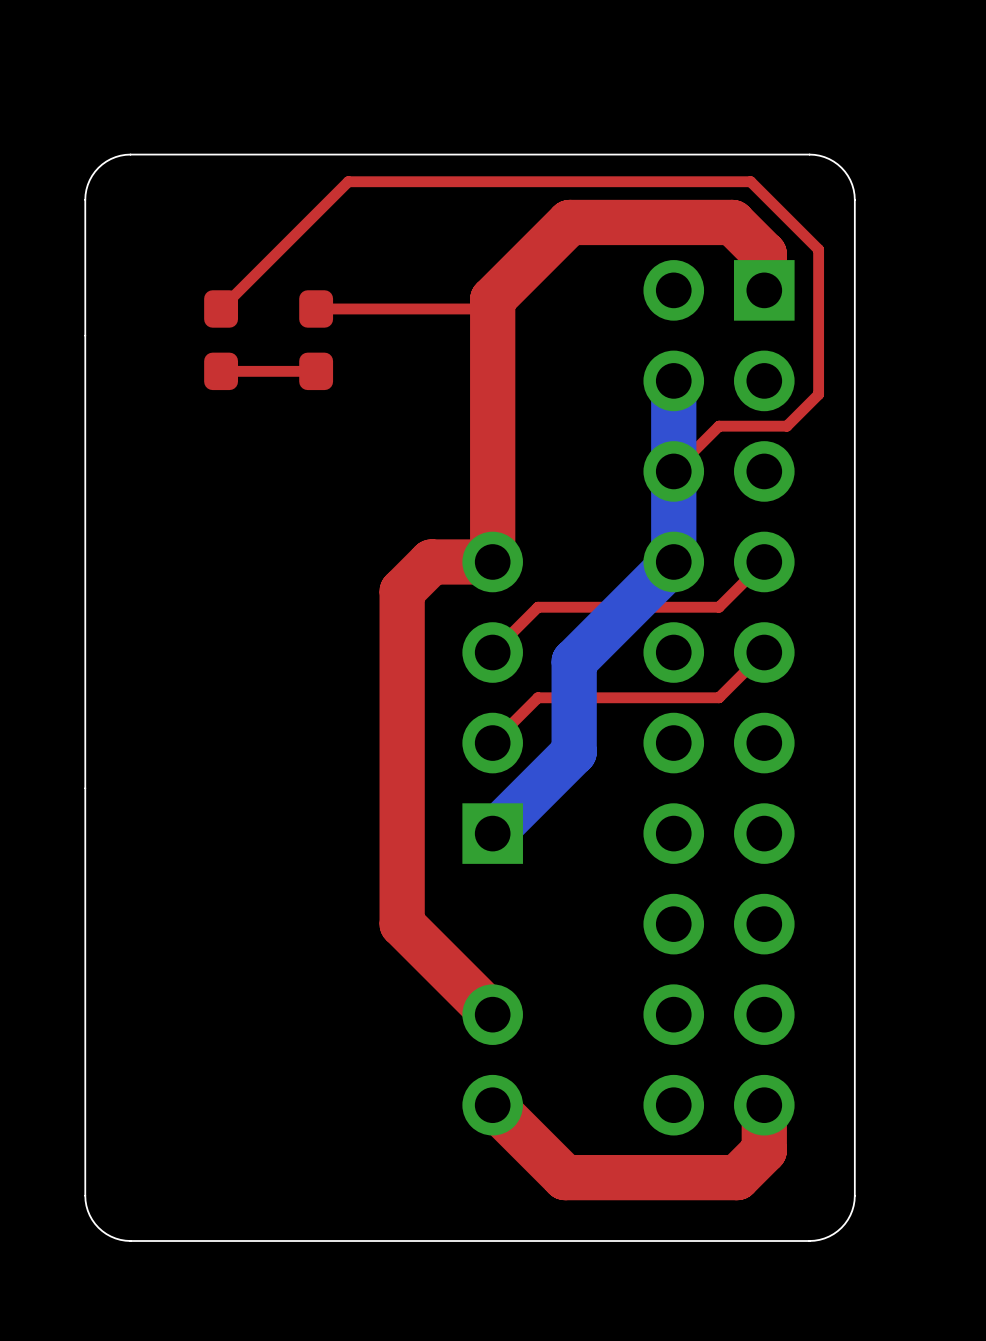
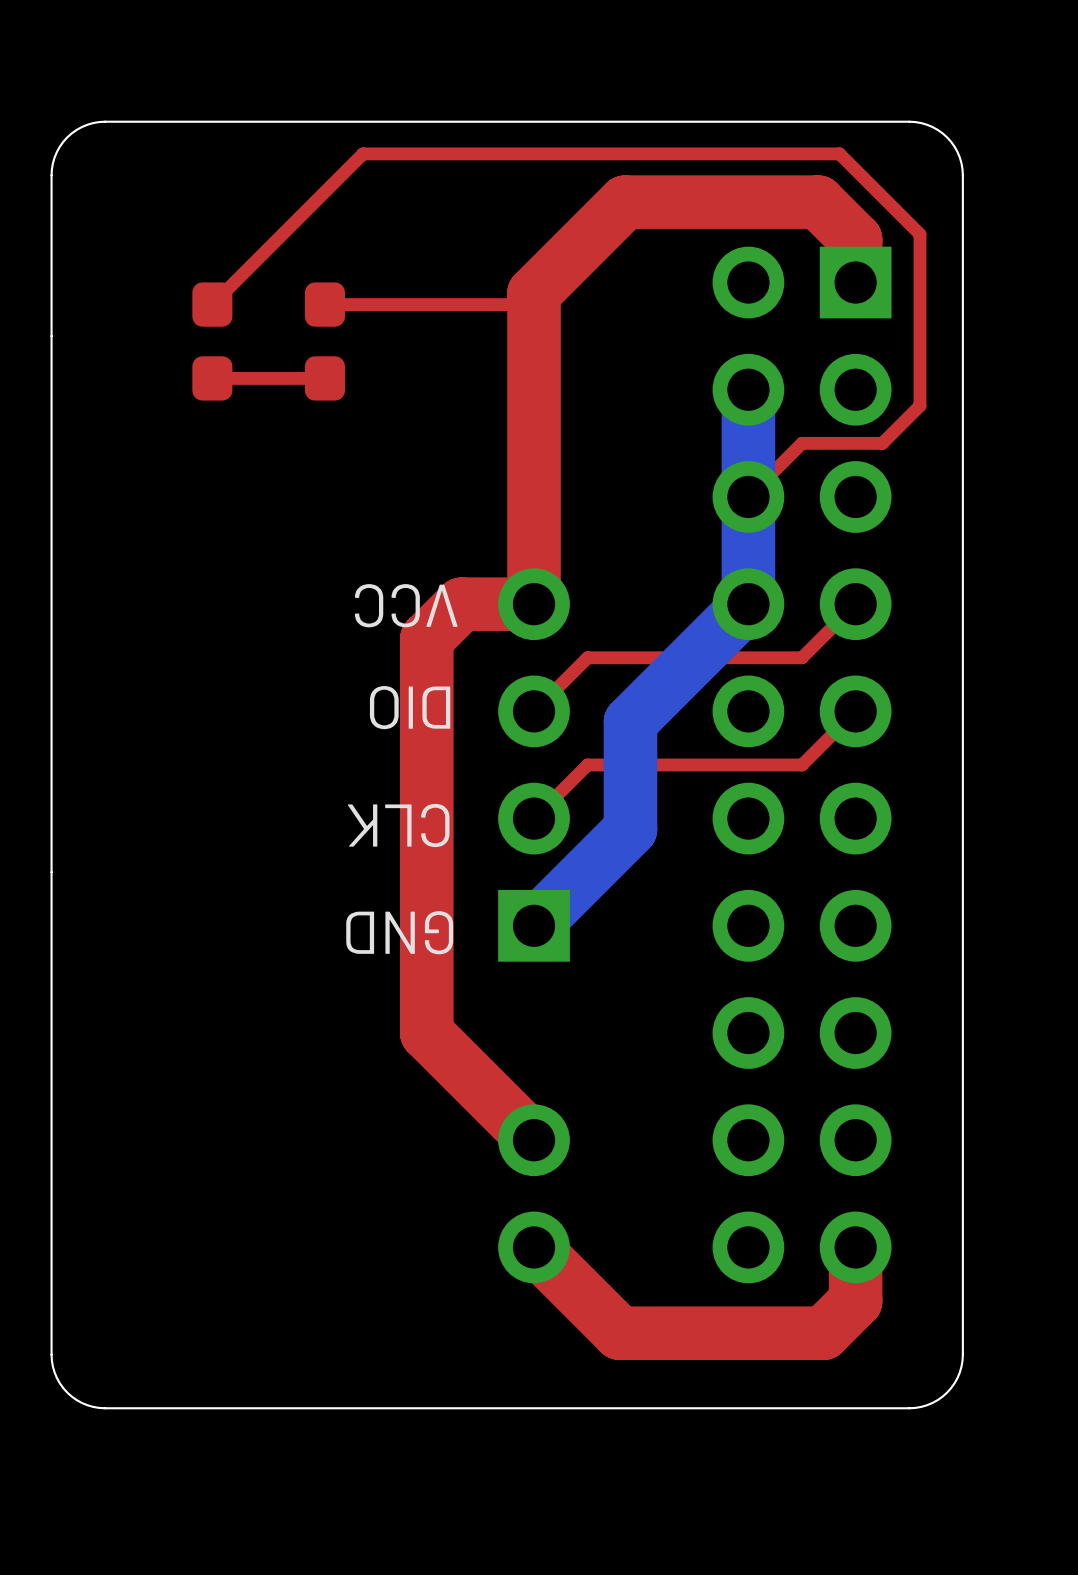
text: none -> VCC (406, 605)
text: none -> DIO (410, 707)
text: none -> CLK (398, 825)
text: none -> GND (399, 932)

